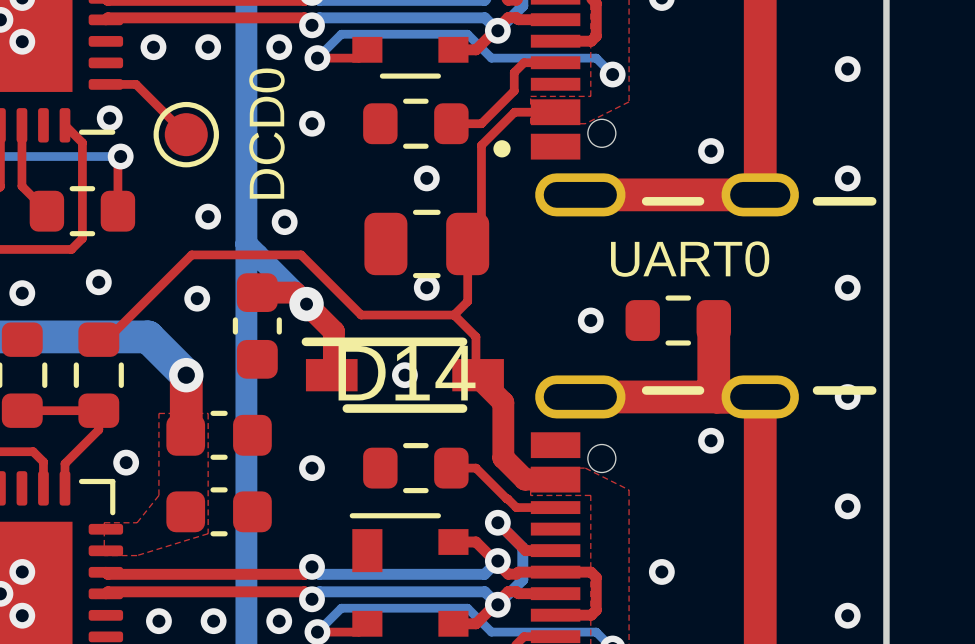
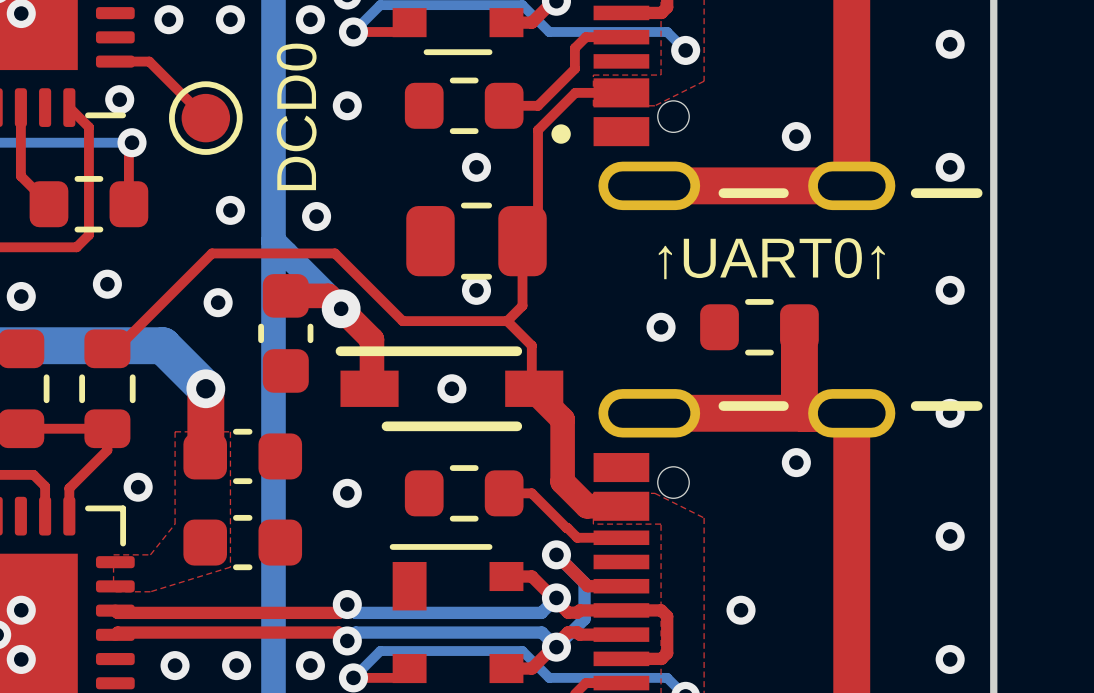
text: UART0 (690, 259) -> ↑UART0↑ (771, 258)
D14 name: D14 (407, 373) -> none

